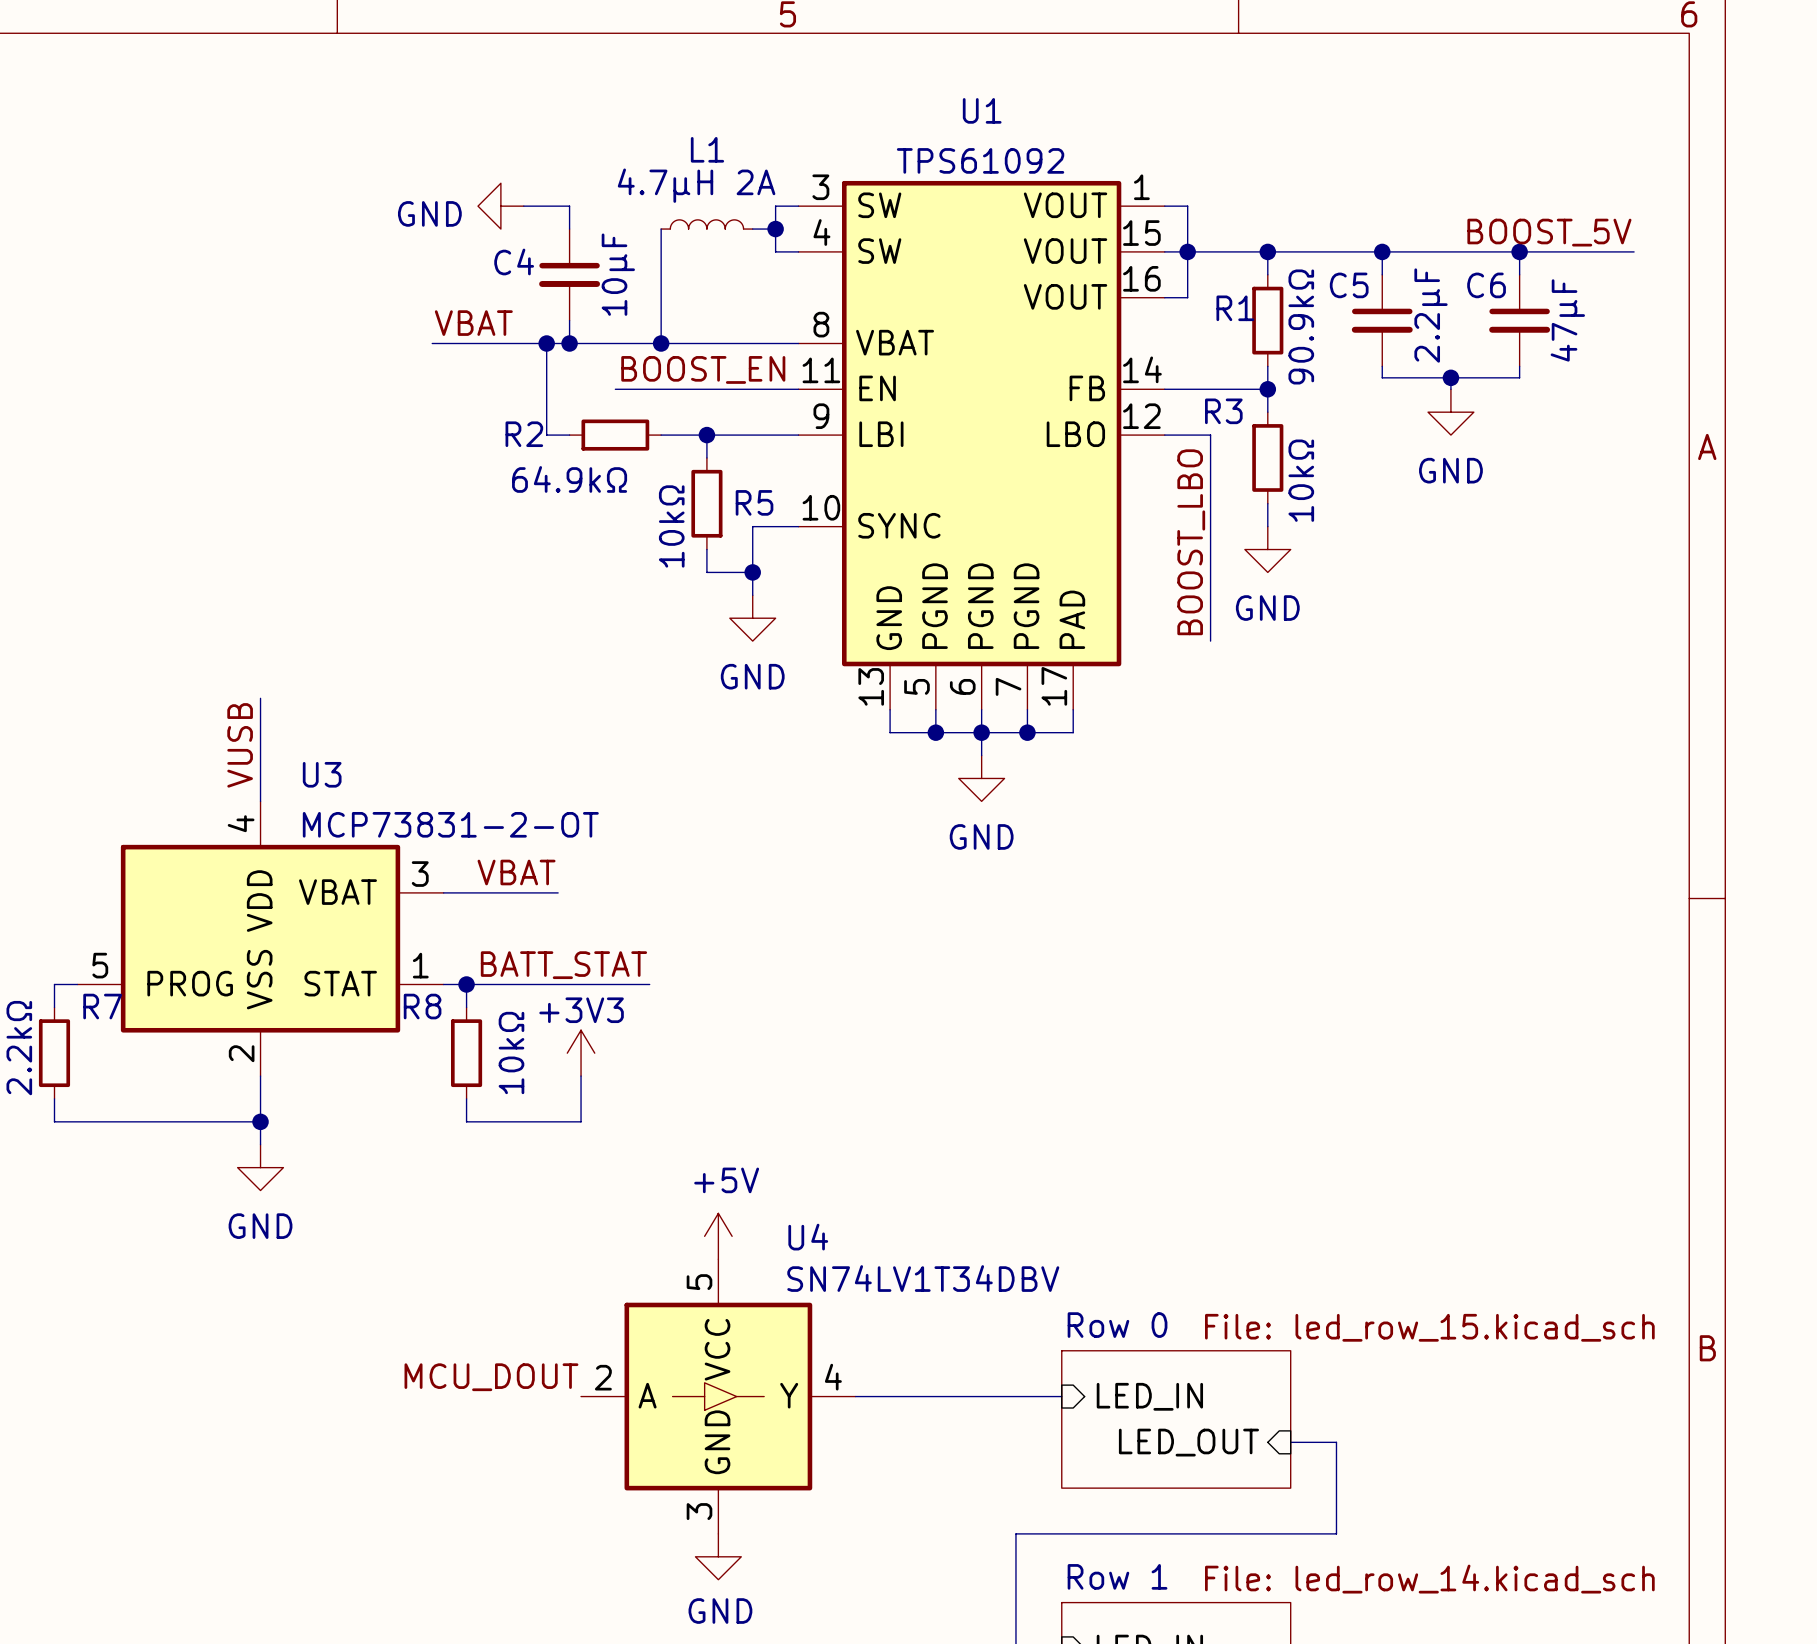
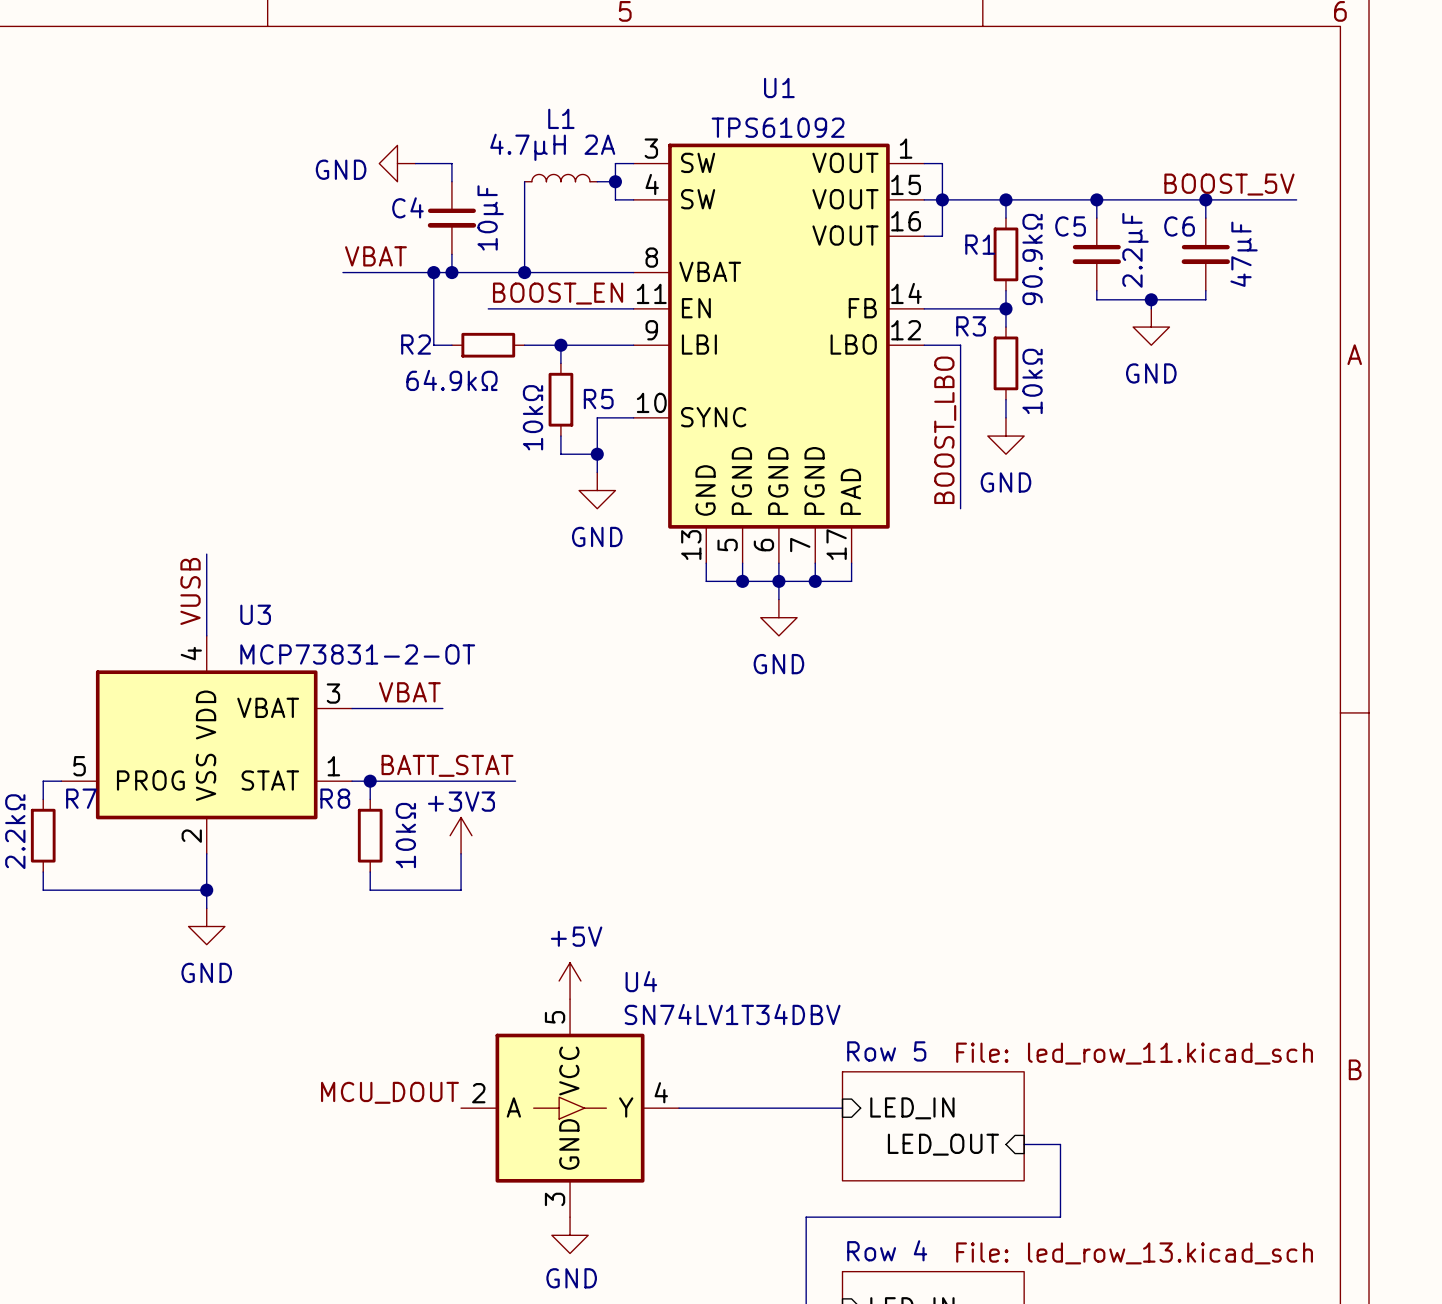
sheet Row 0 name: Row 0 (1117, 1325) -> Row 5 (886, 1051)
sheet Row 0 value: File: led_row_15.kicad_sch (1429, 1327) -> File: led_row_11.kicad_sch (1134, 1053)
sheet Row 1 name: Row 1 (1117, 1576) -> Row 4 (887, 1250)
sheet Row 1 value: File: led_row_14.kicad_sch (1429, 1579) -> File: led_row_13.kicad_sch (1134, 1253)

